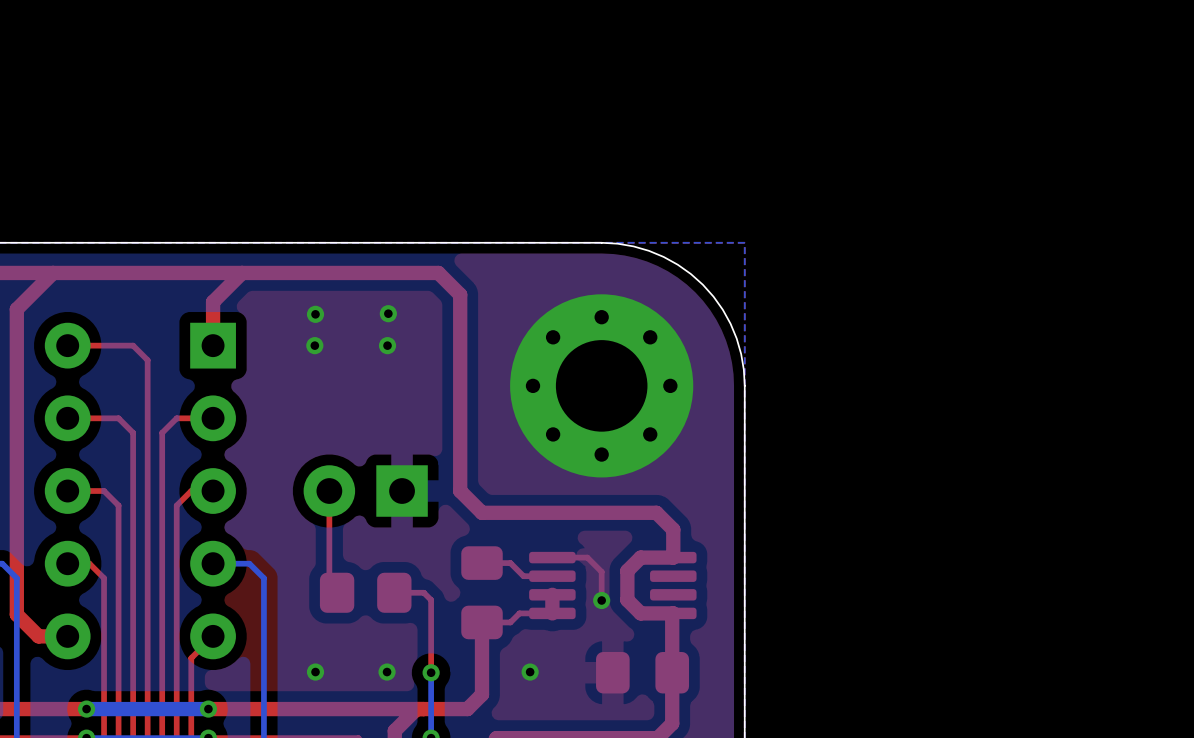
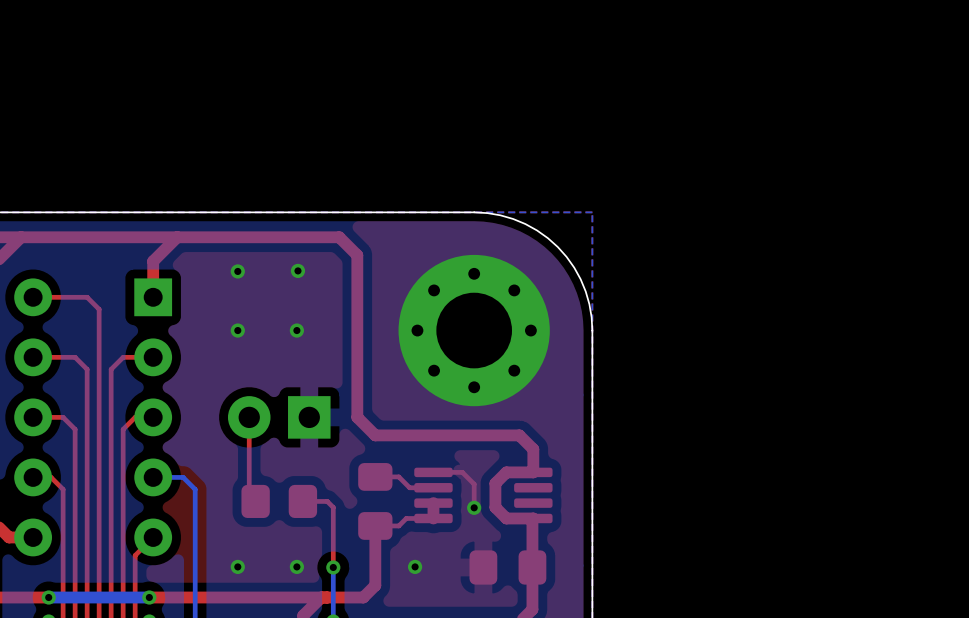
via position: (314, 345) -> (237, 330)
via position: (387, 345) -> (296, 330)

